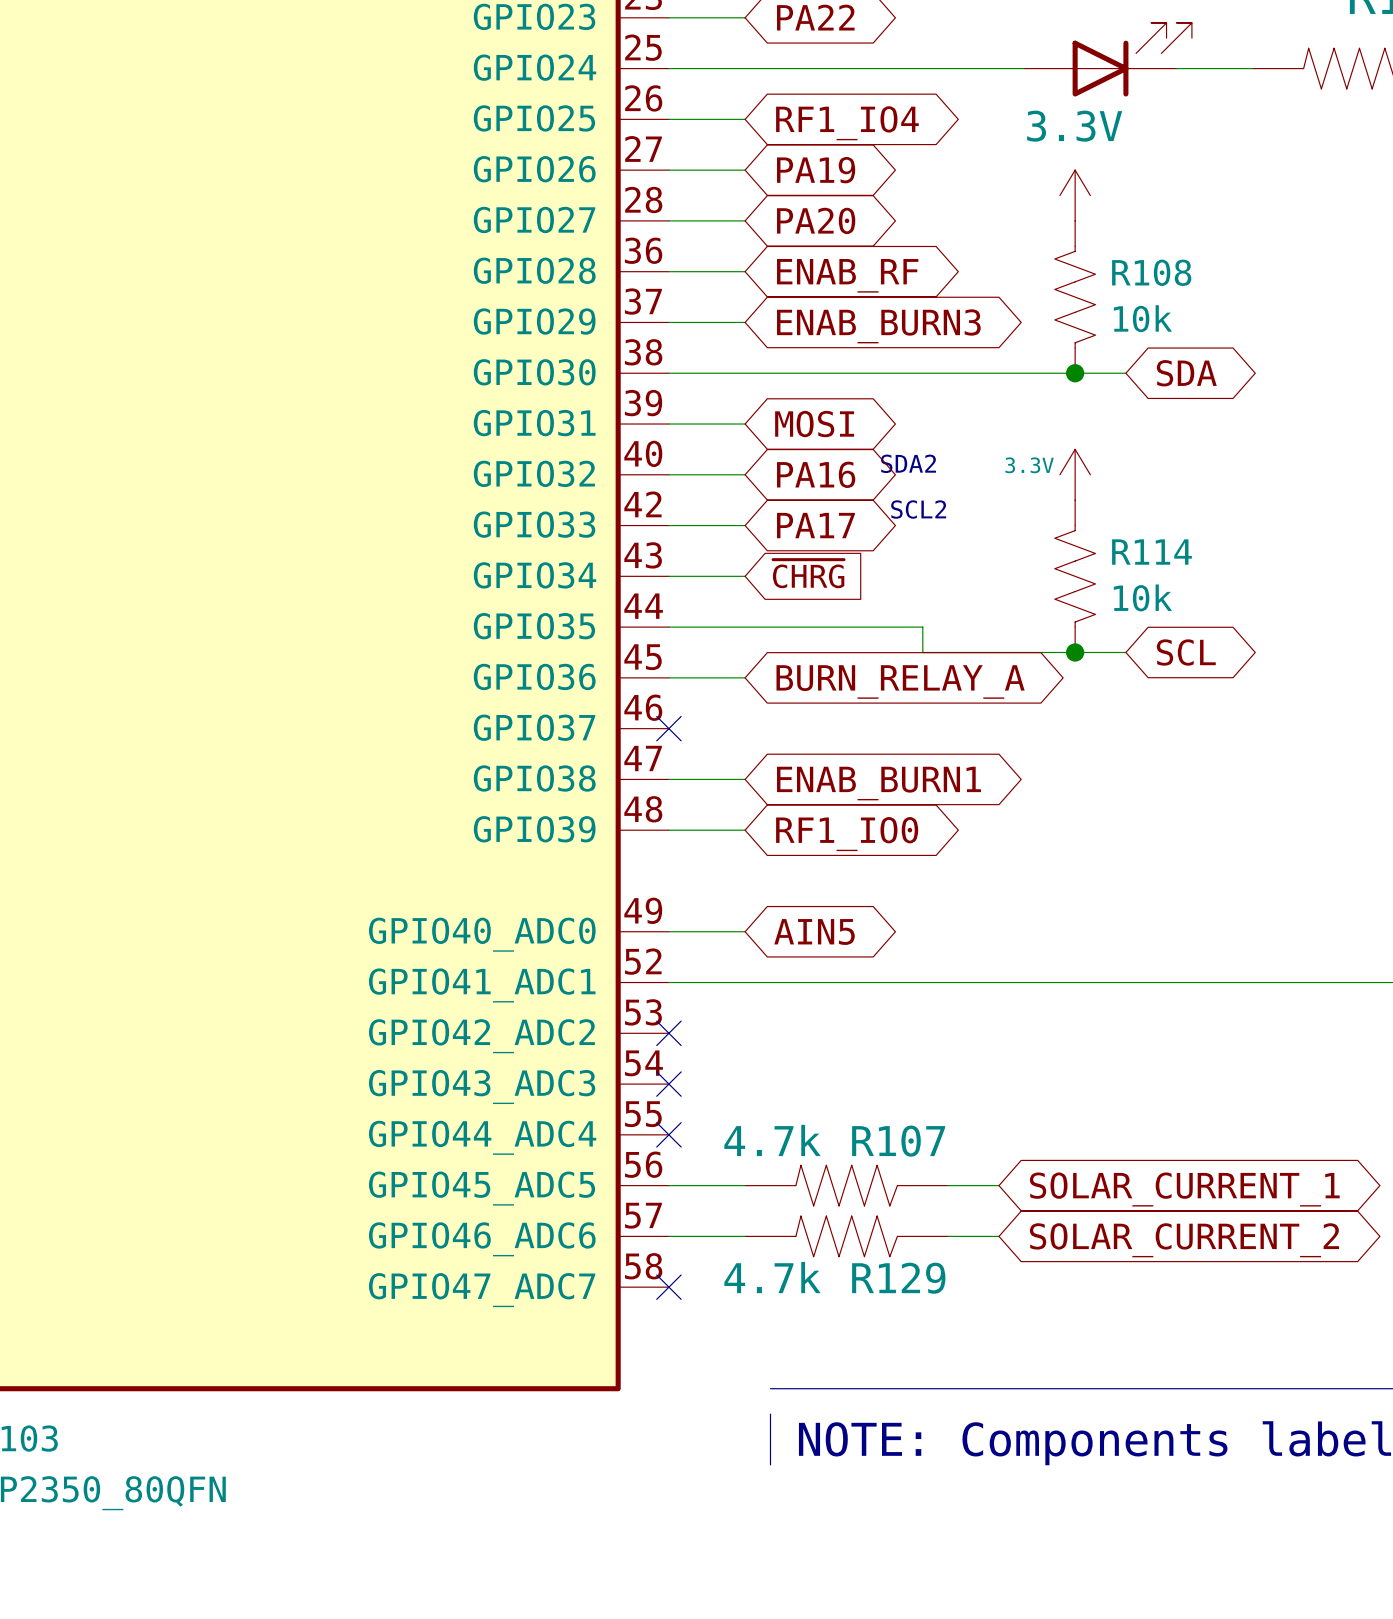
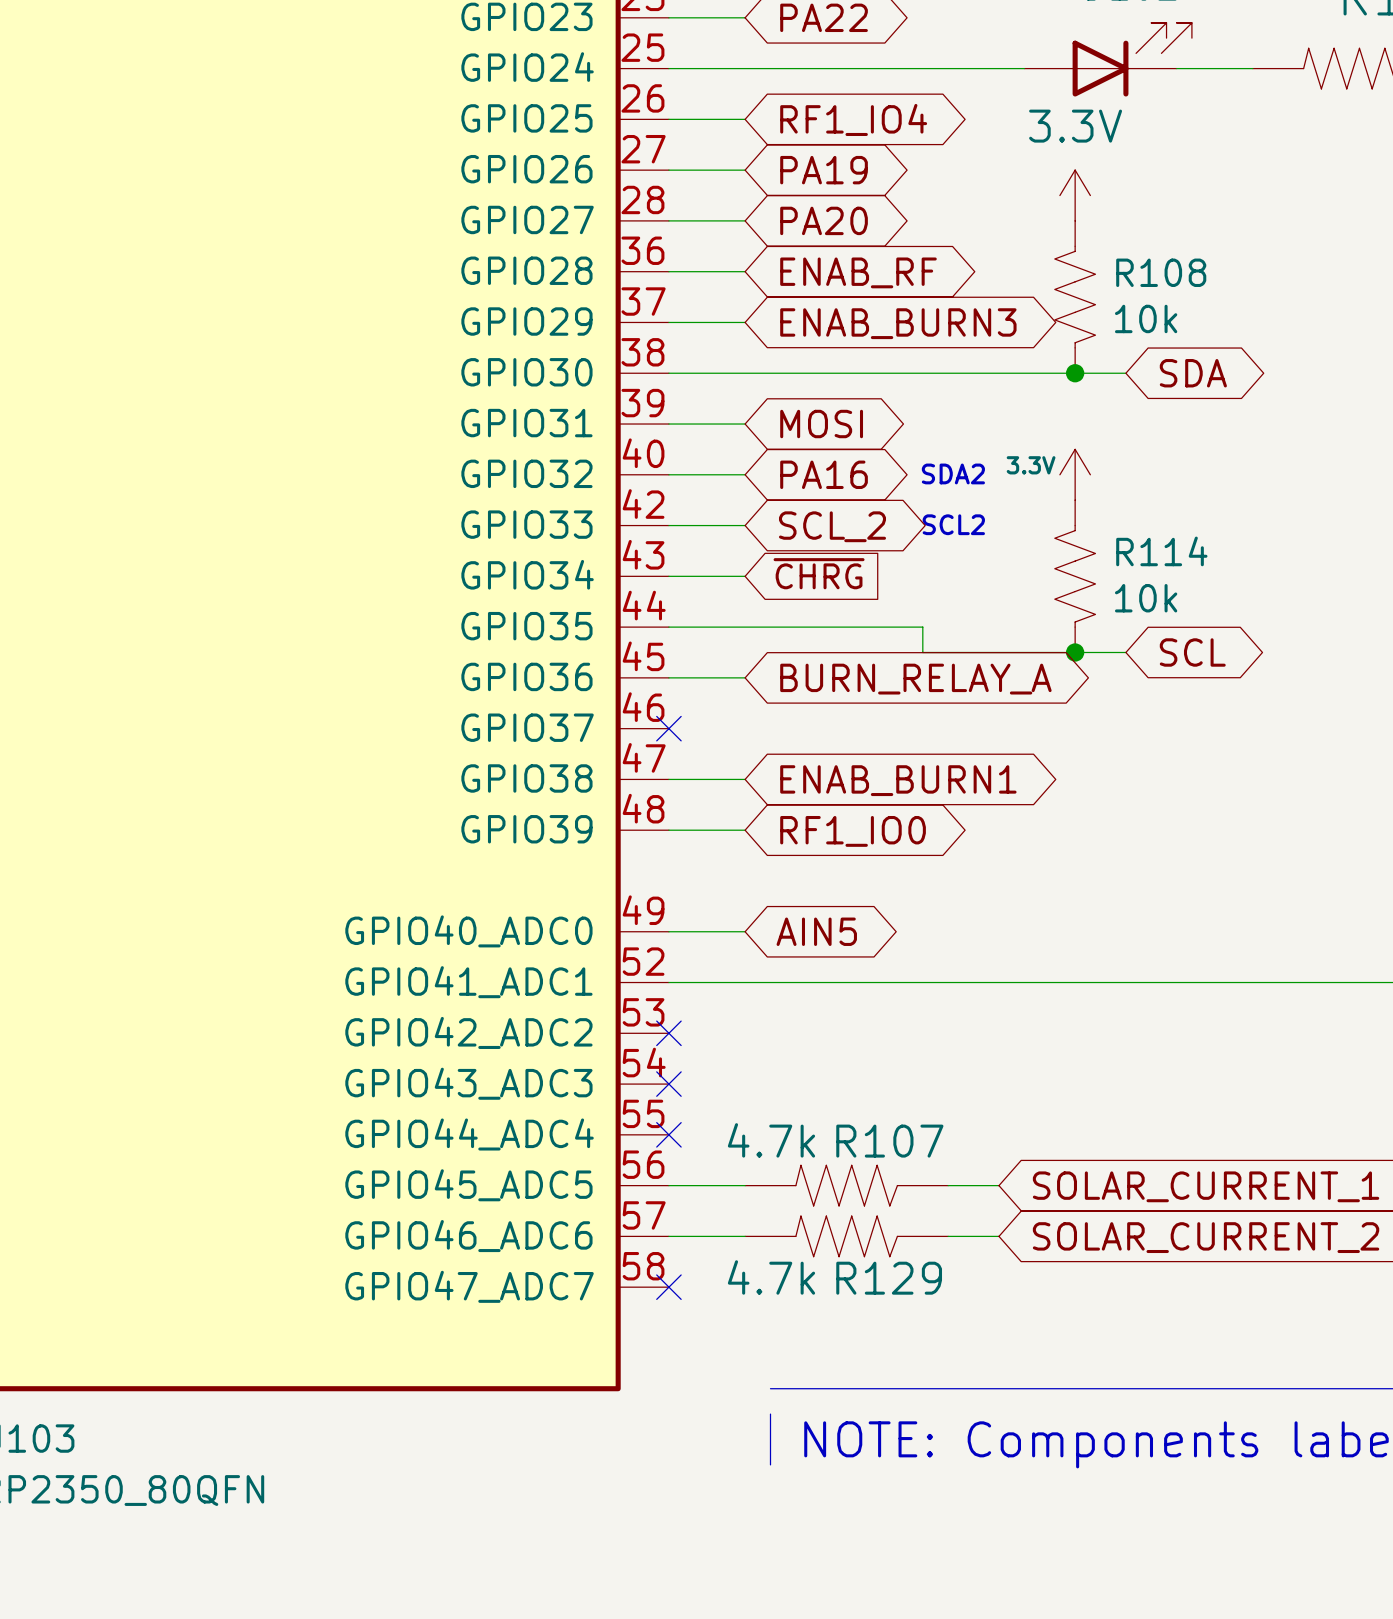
text position: SDA2 (908, 463) -> SDA2 (953, 473)
text position: SCL2 (918, 509) -> SCL2 (953, 524)
global label: PA17 (815, 525) -> SCL_2 (832, 526)

